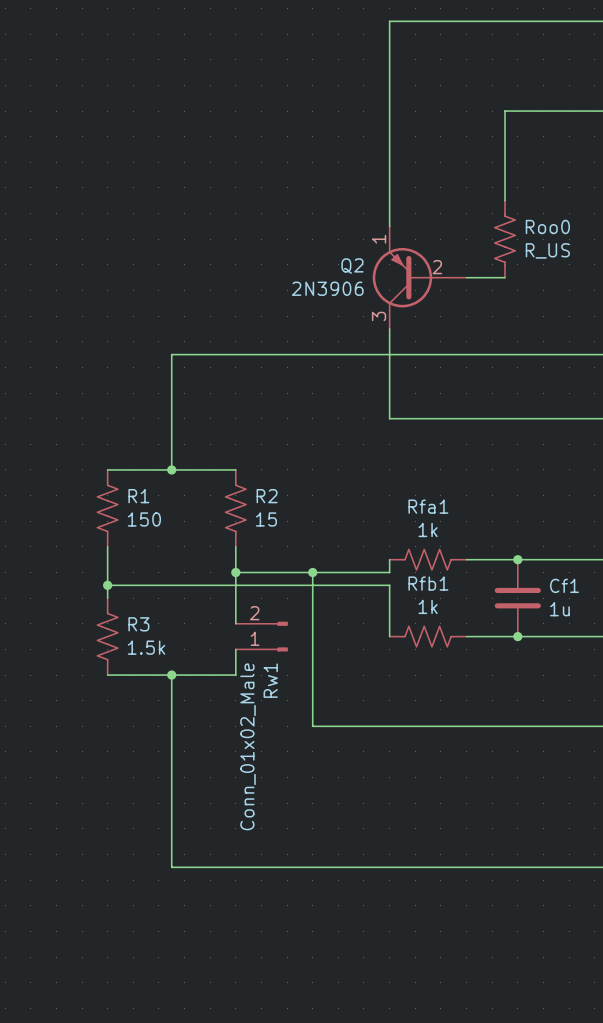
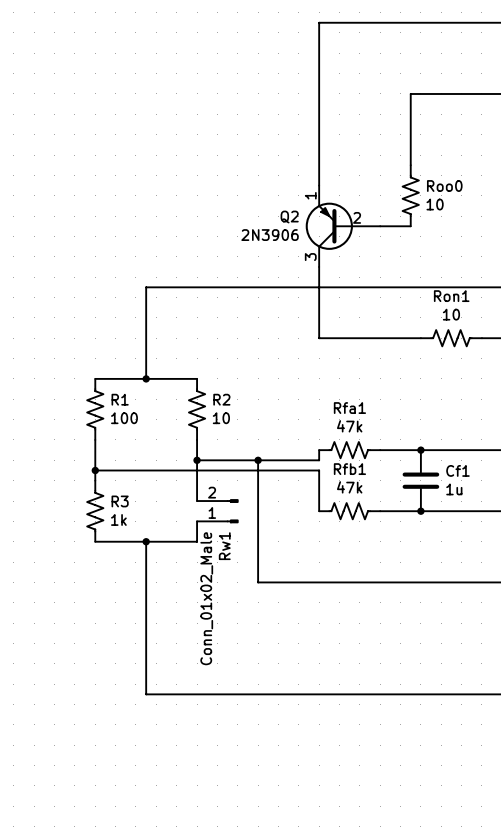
Roo0 value: R_US (547, 250) -> 10 (435, 204)
Ron1: none -> 10 (451, 338)
R1 value: 150 (144, 519) -> 100 (124, 418)
R2 value: 15 (266, 519) -> 10 (221, 418)
Rfa1 value: 1k (428, 529) -> 47k (349, 426)
Rfb1 value: 1k (428, 606) -> 47k (349, 487)
R3 value: 1.5k (146, 647) -> 1k (118, 519)

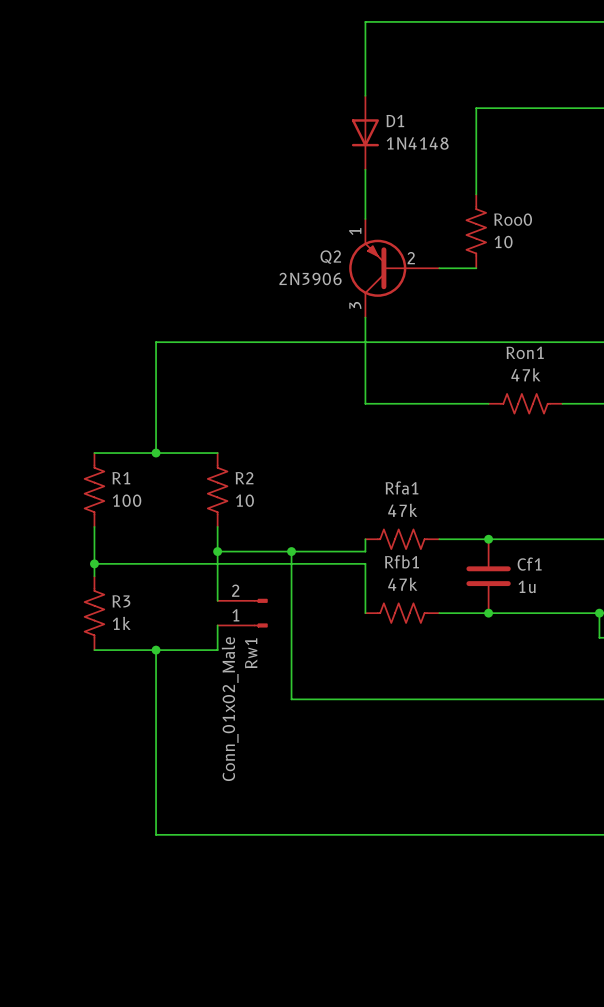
D1: none -> 1N4148 (365, 132)
Ron1 value: 10 (451, 314) -> 47k (525, 374)

